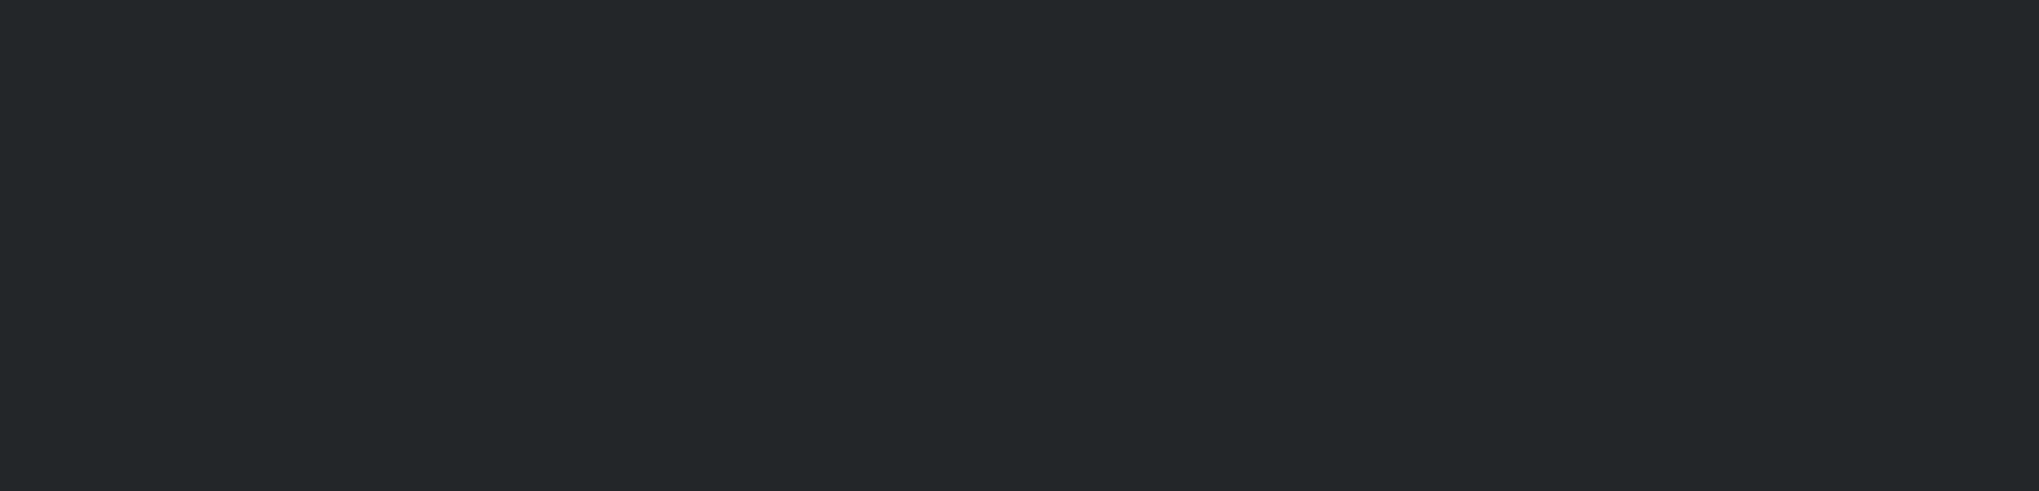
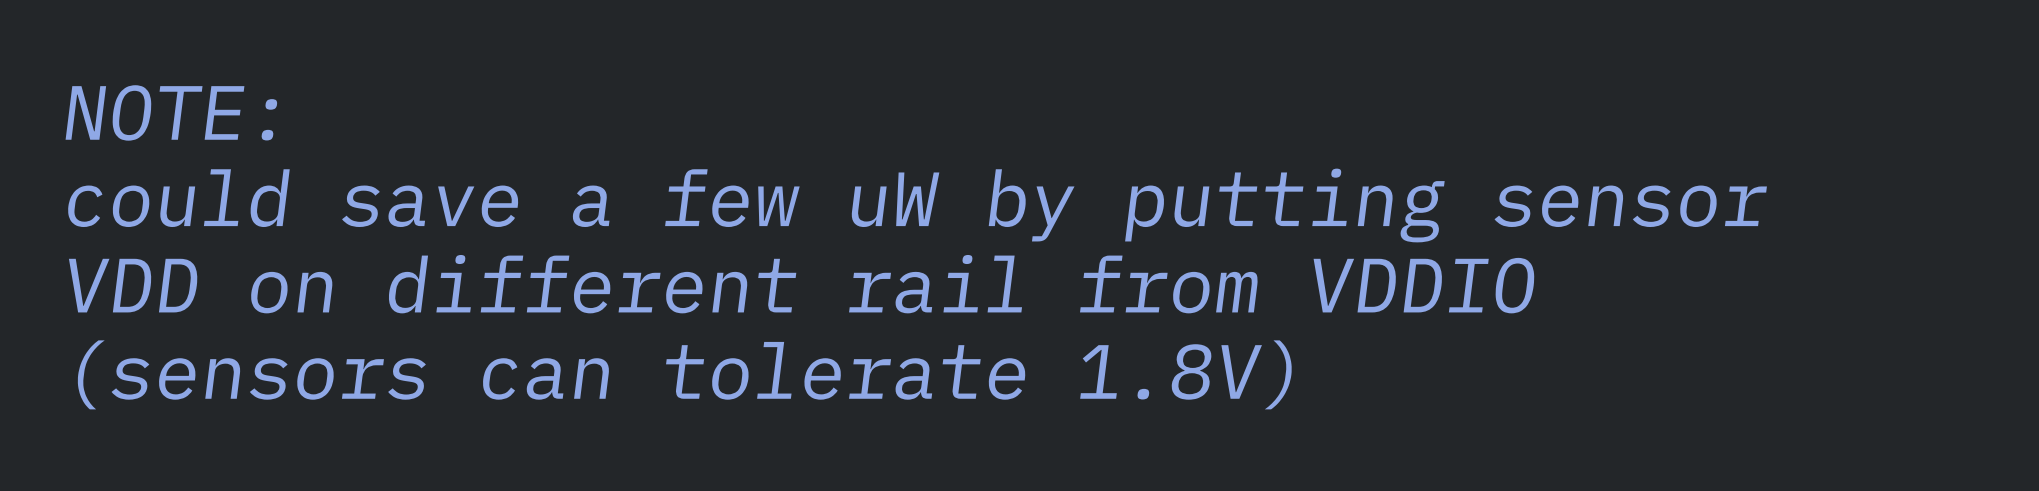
text: none -> NOTE: (171, 112)
text: none -> could save a few uW by putting sensor (917, 205)
text: none -> VDD on different rail from VDDIO (801, 284)
text: none -> (sensors can tolerate 1.8V) (684, 374)

